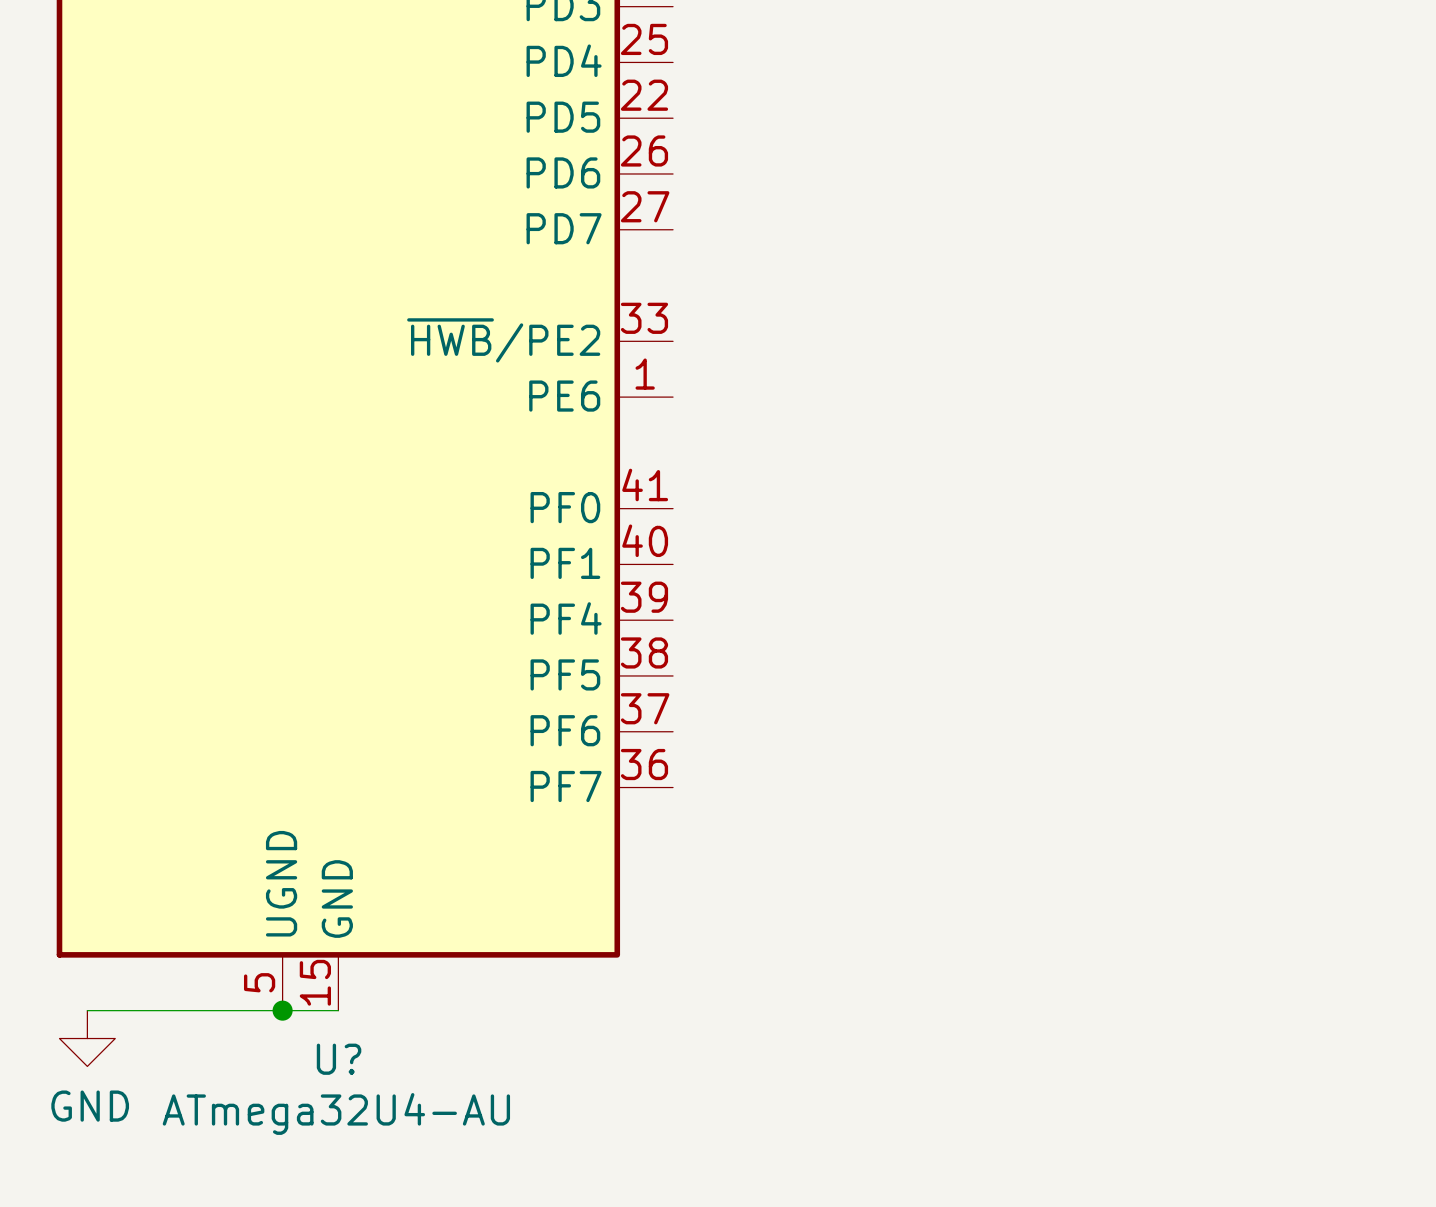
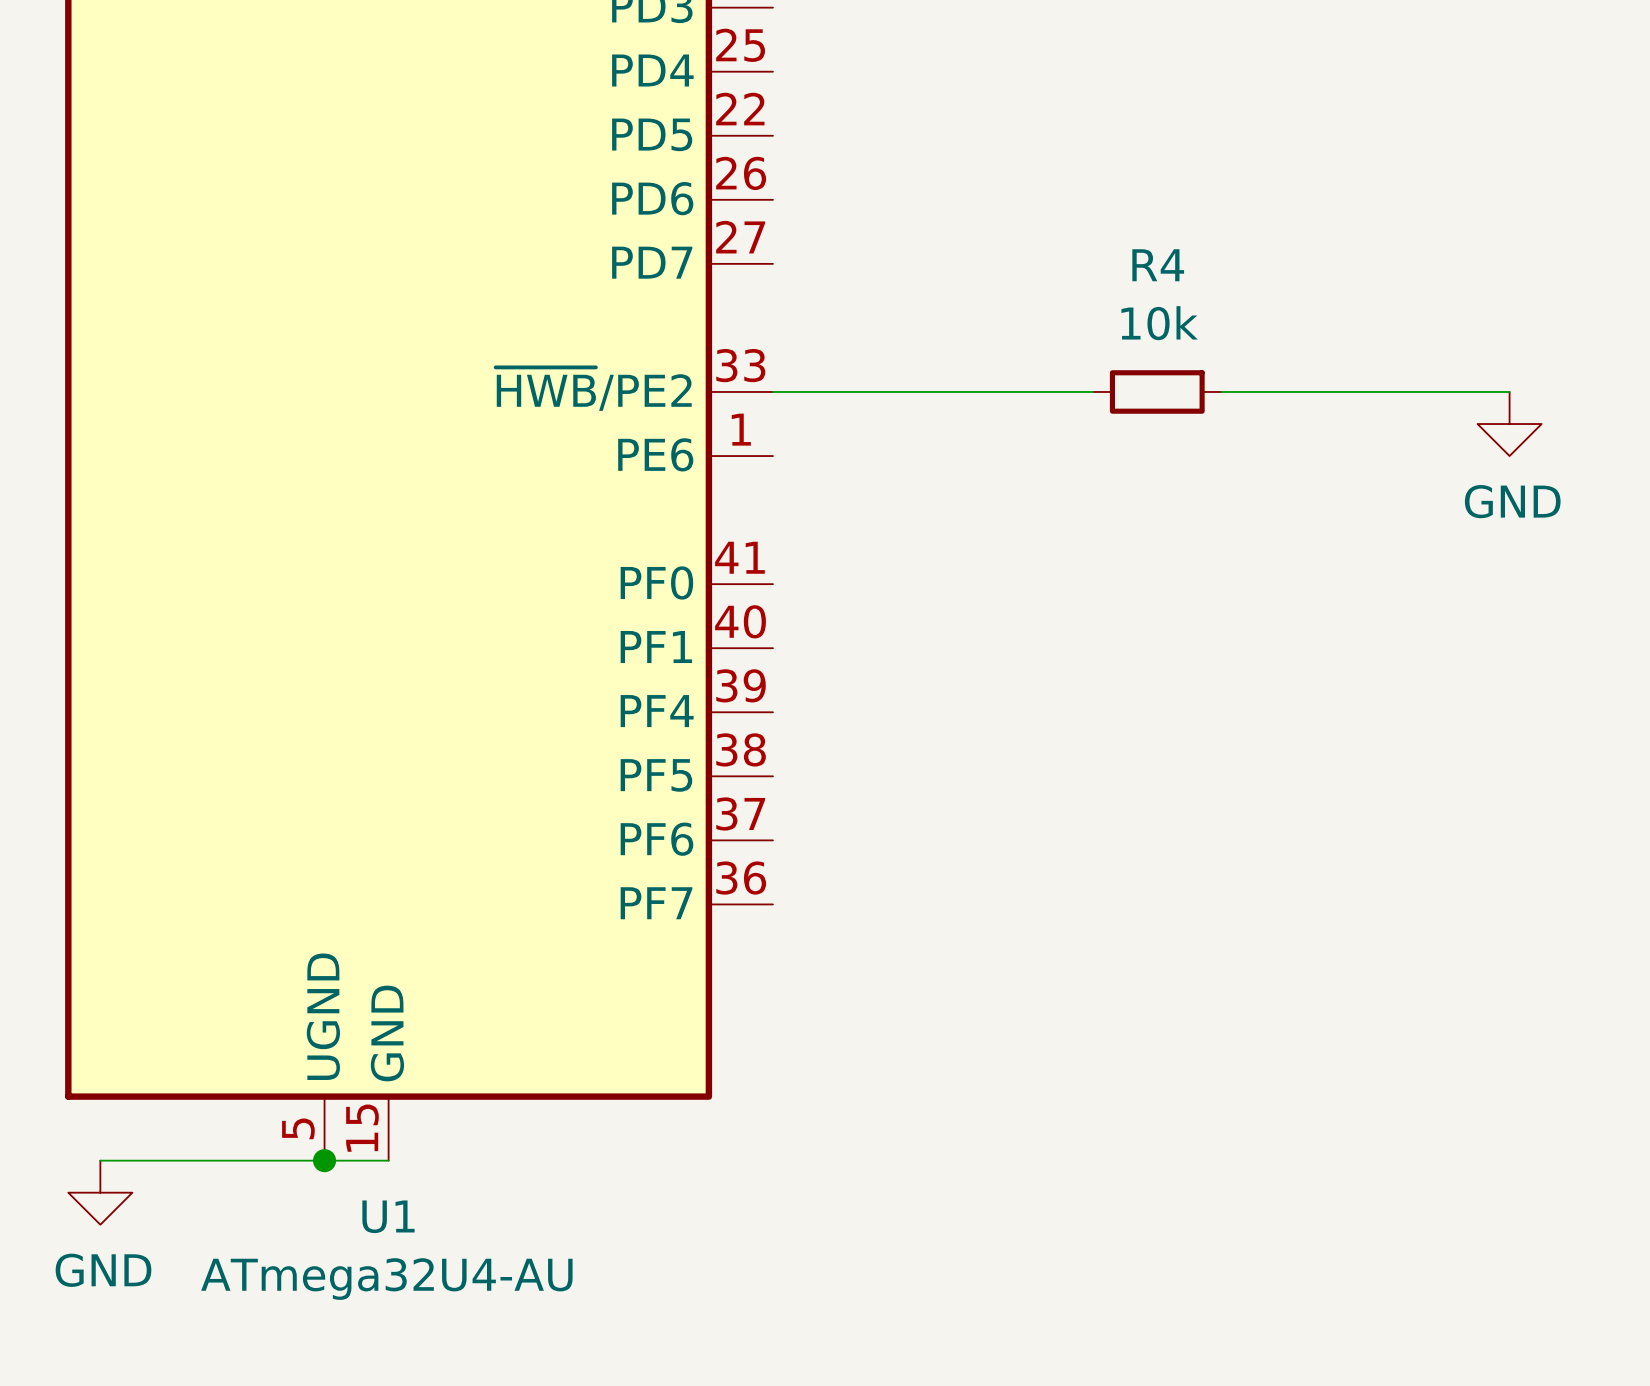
wire: none -> (772, 391) (1093, 391)
R4: none -> 10k (1157, 391)
wire: none -> (1221, 391) (1509, 391)
power symbol: none -> GND (1509, 424)
U? name: U? (339, 1059) -> U1 (388, 1216)

